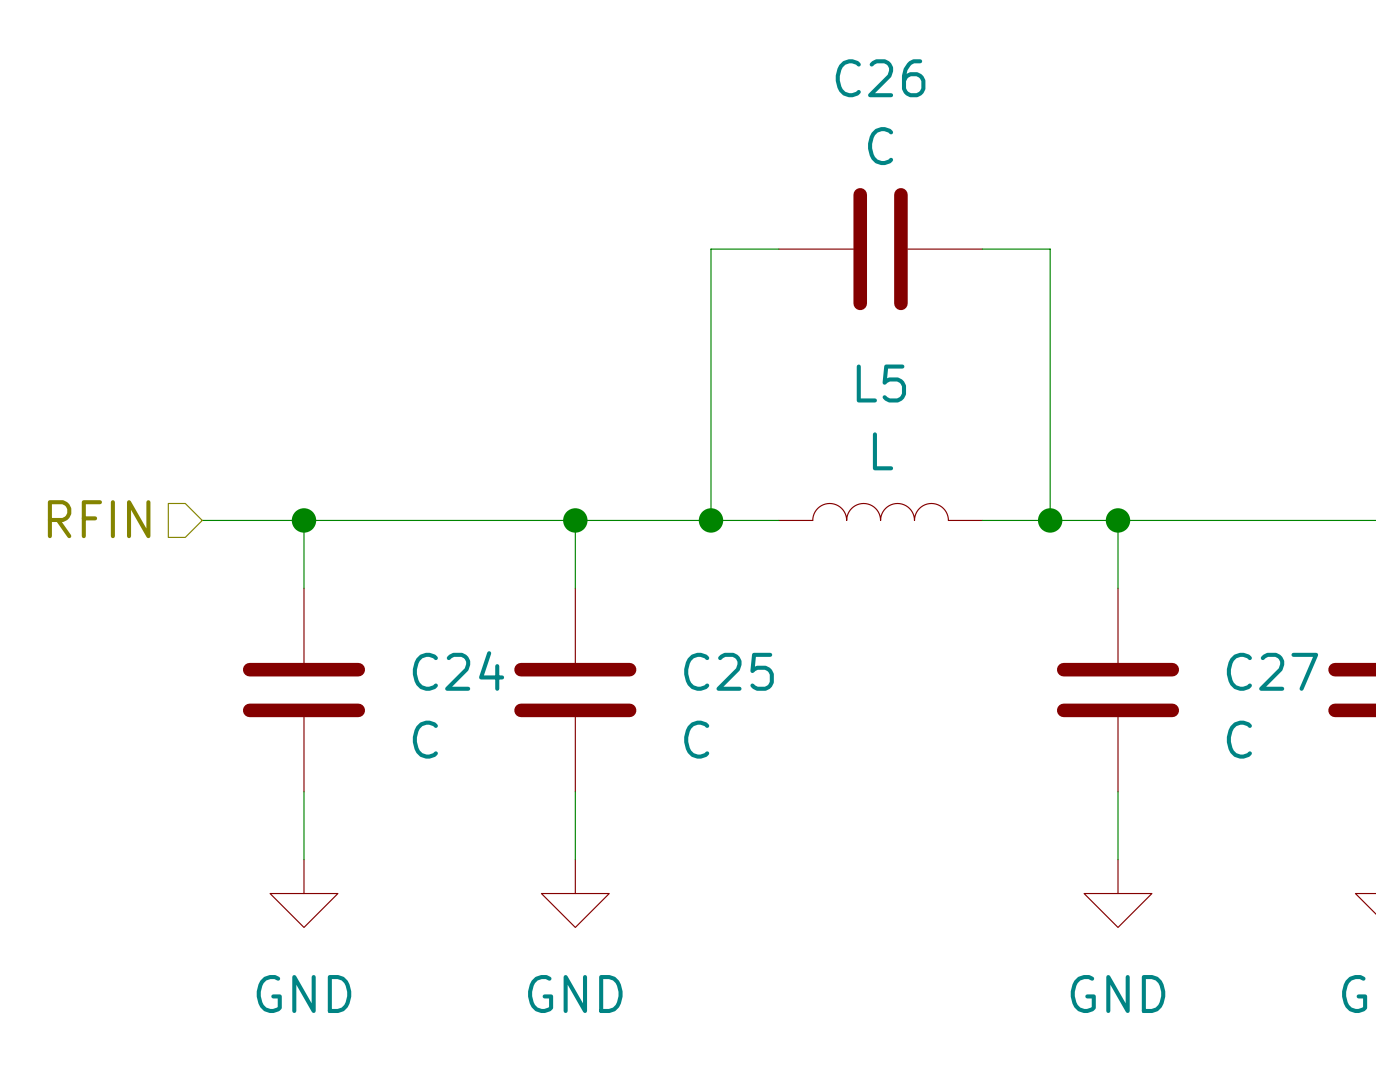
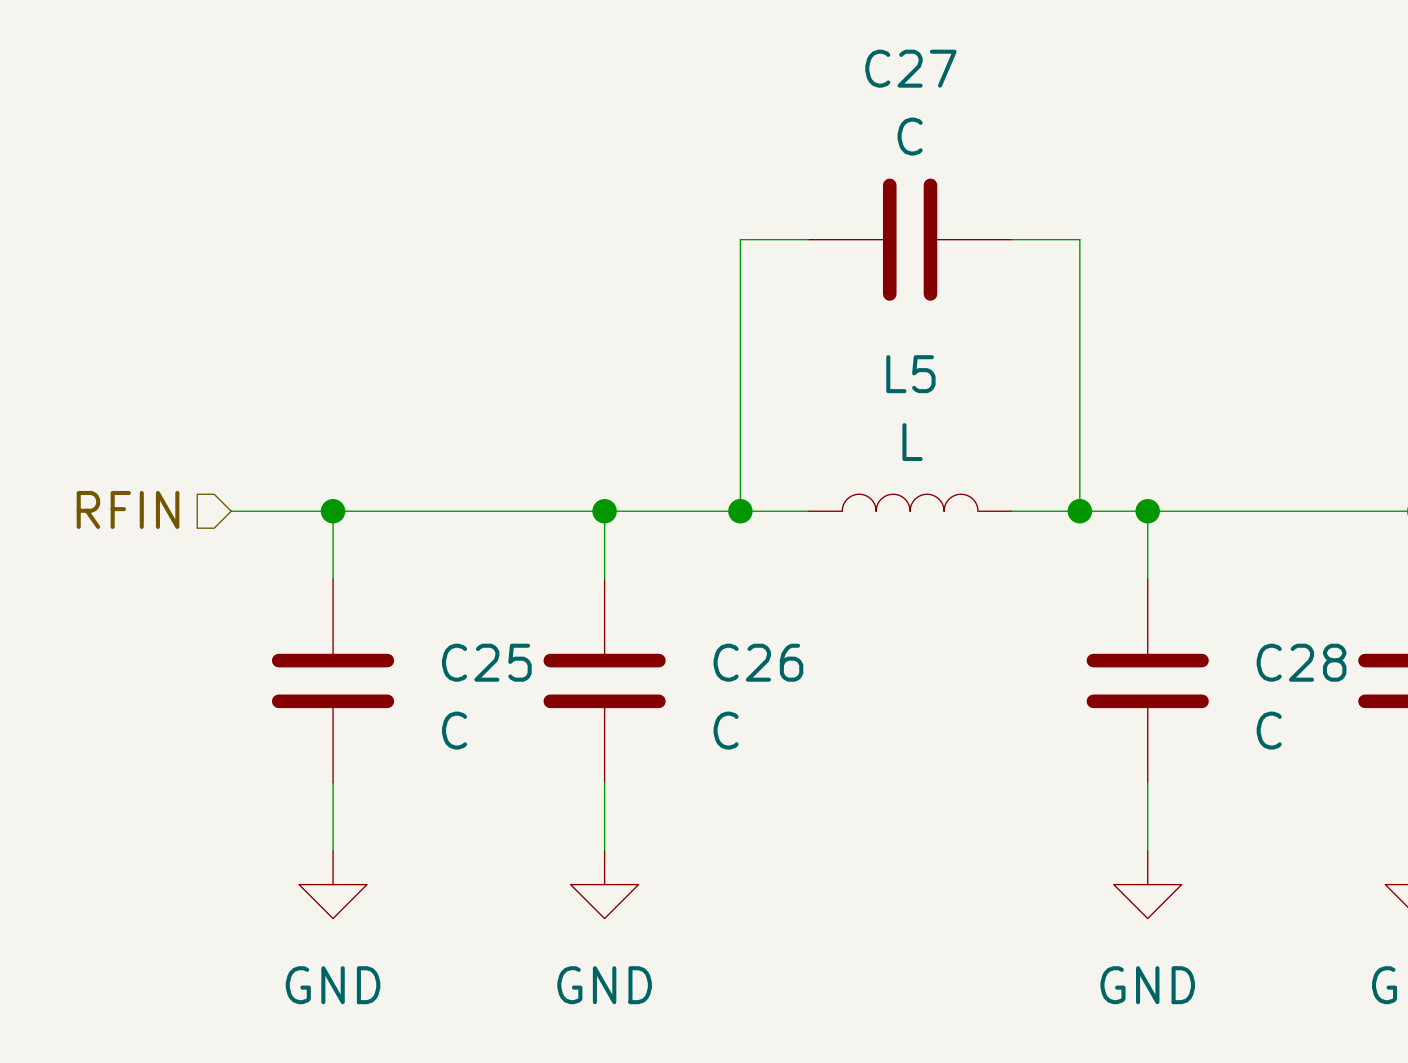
C26 name: C26 (880, 78) -> C27 (910, 68)
C24 name: C24 (458, 670) -> C25 (486, 662)
C25 name: C25 (729, 671) -> C26 (758, 662)
C27 name: C27 (1272, 671) -> C28 (1301, 662)

